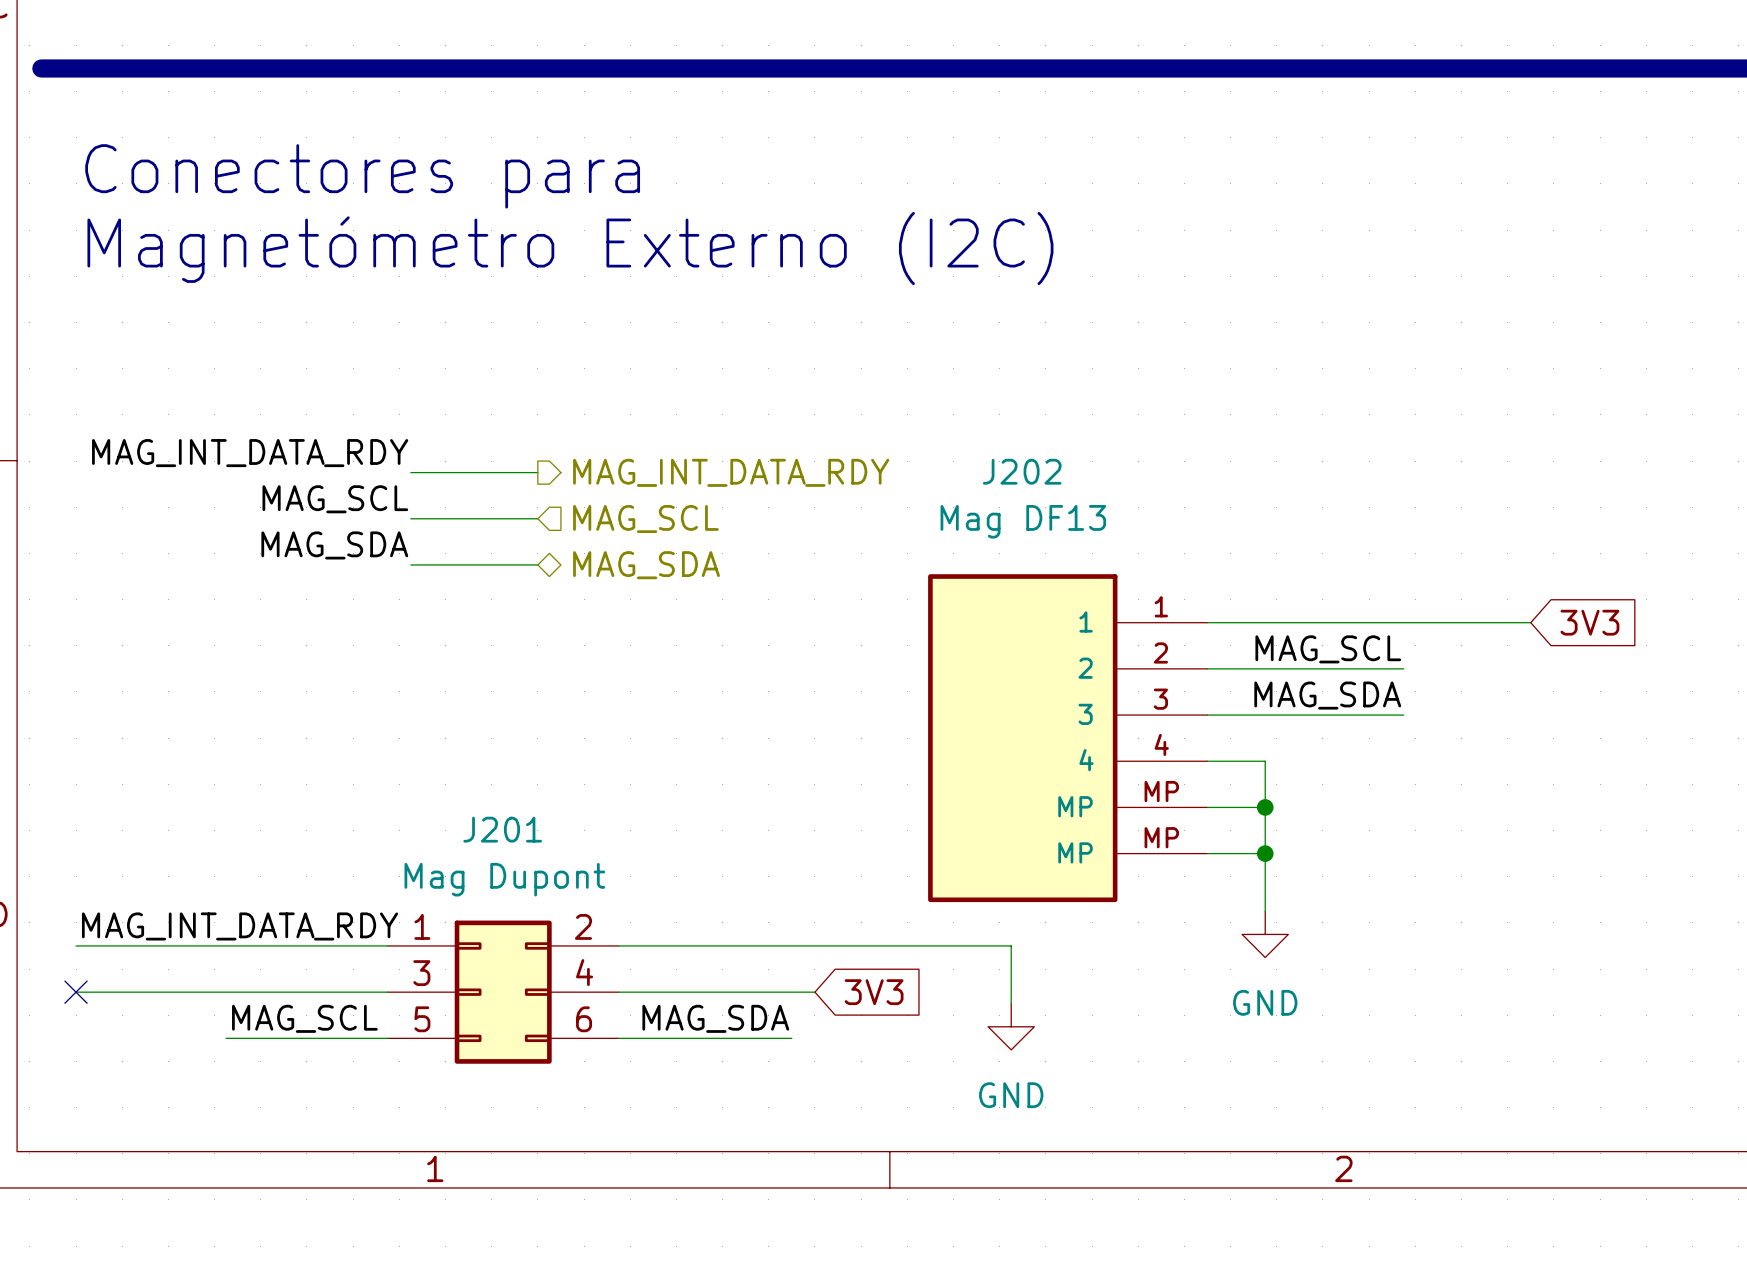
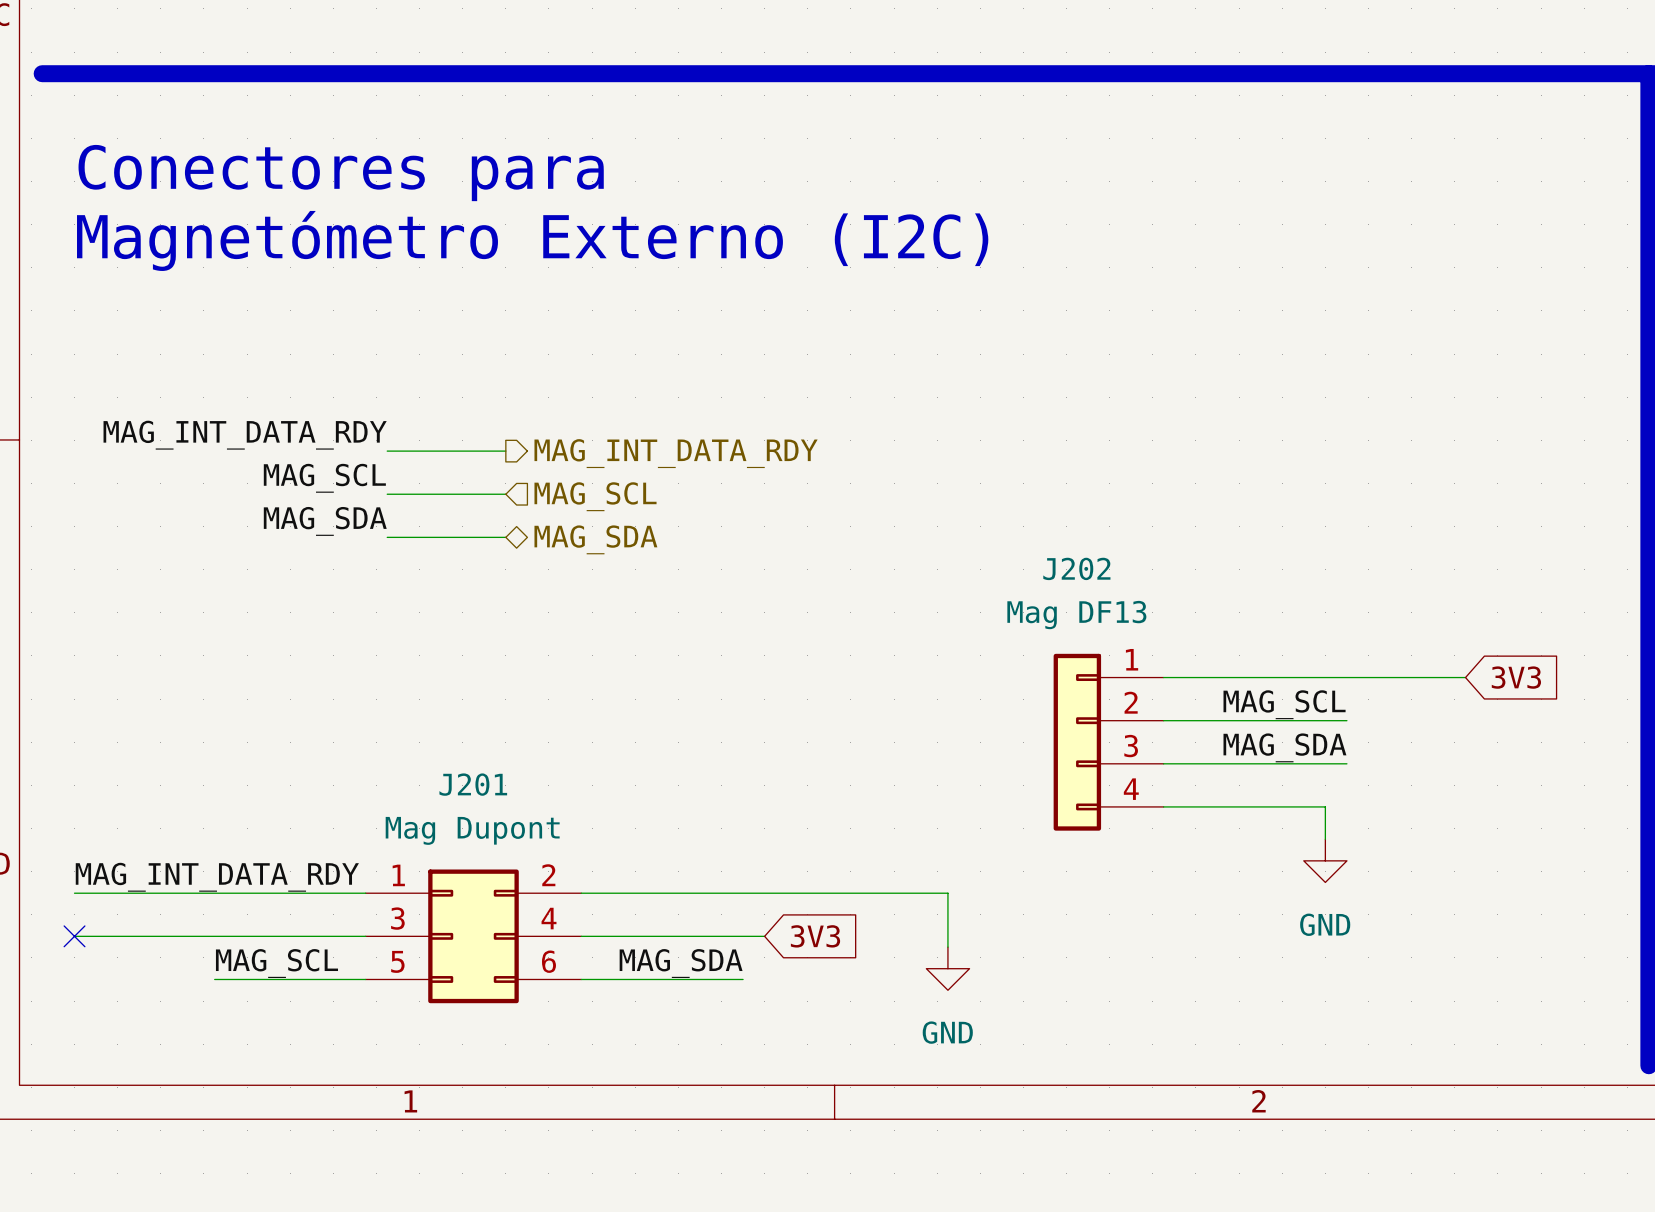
J202 name position: J202 (1022, 471) -> J202 (1076, 568)
J202 value position: Mag DF13 (1023, 521) -> Mag DF13 (1076, 615)
J202 symbol: [928, 574, 1208, 903] -> [1053, 653, 1164, 831]
wire: (1207, 622) (1530, 622) -> none
global label position: 3V3 (1589, 622) -> 3V3 (1516, 677)
label position: MAG_SCL (1328, 649) -> MAG_SCL (1284, 704)
wire: (1207, 668) (1403, 668) -> none
label position: MAG_SDA (1327, 695) -> MAG_SDA (1284, 747)
wire: none -> (1314, 677) (1465, 677)
wire: (1265, 761) (1265, 911) -> (1185, 720) (1346, 720)
wire: none -> (1185, 763) (1346, 763)
junction: (1265, 807) -> none
wire: none -> (1185, 806) (1325, 806) (1325, 839)
junction: (1265, 853) -> none
power symbol position: GND (1265, 934) -> GND (1325, 860)

